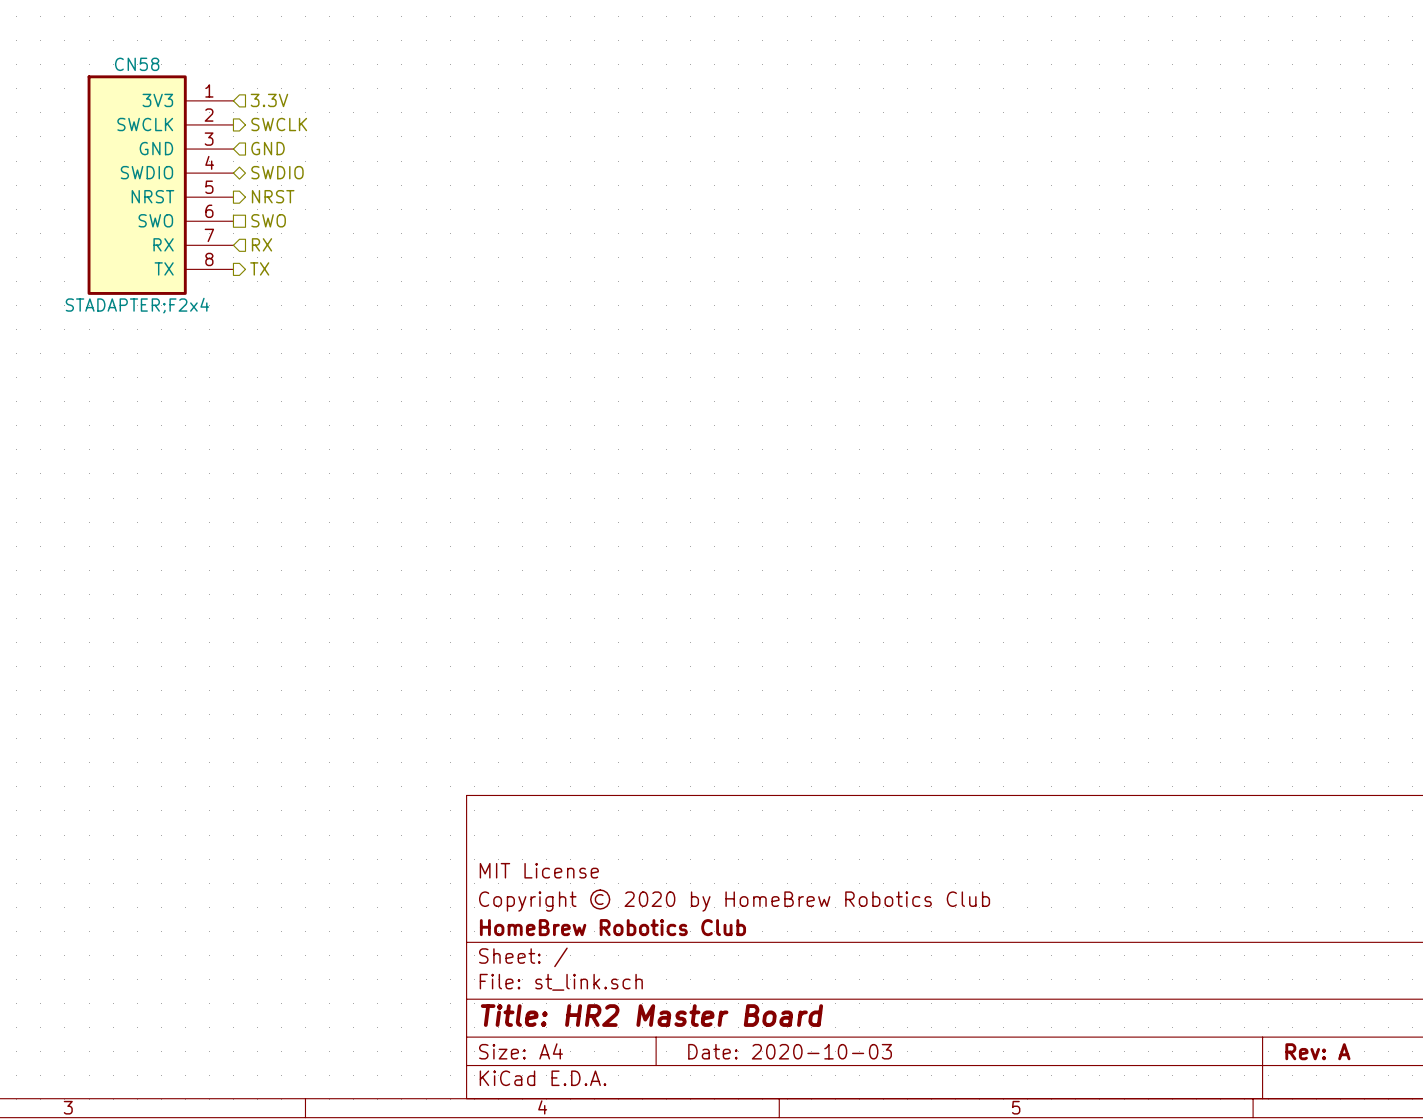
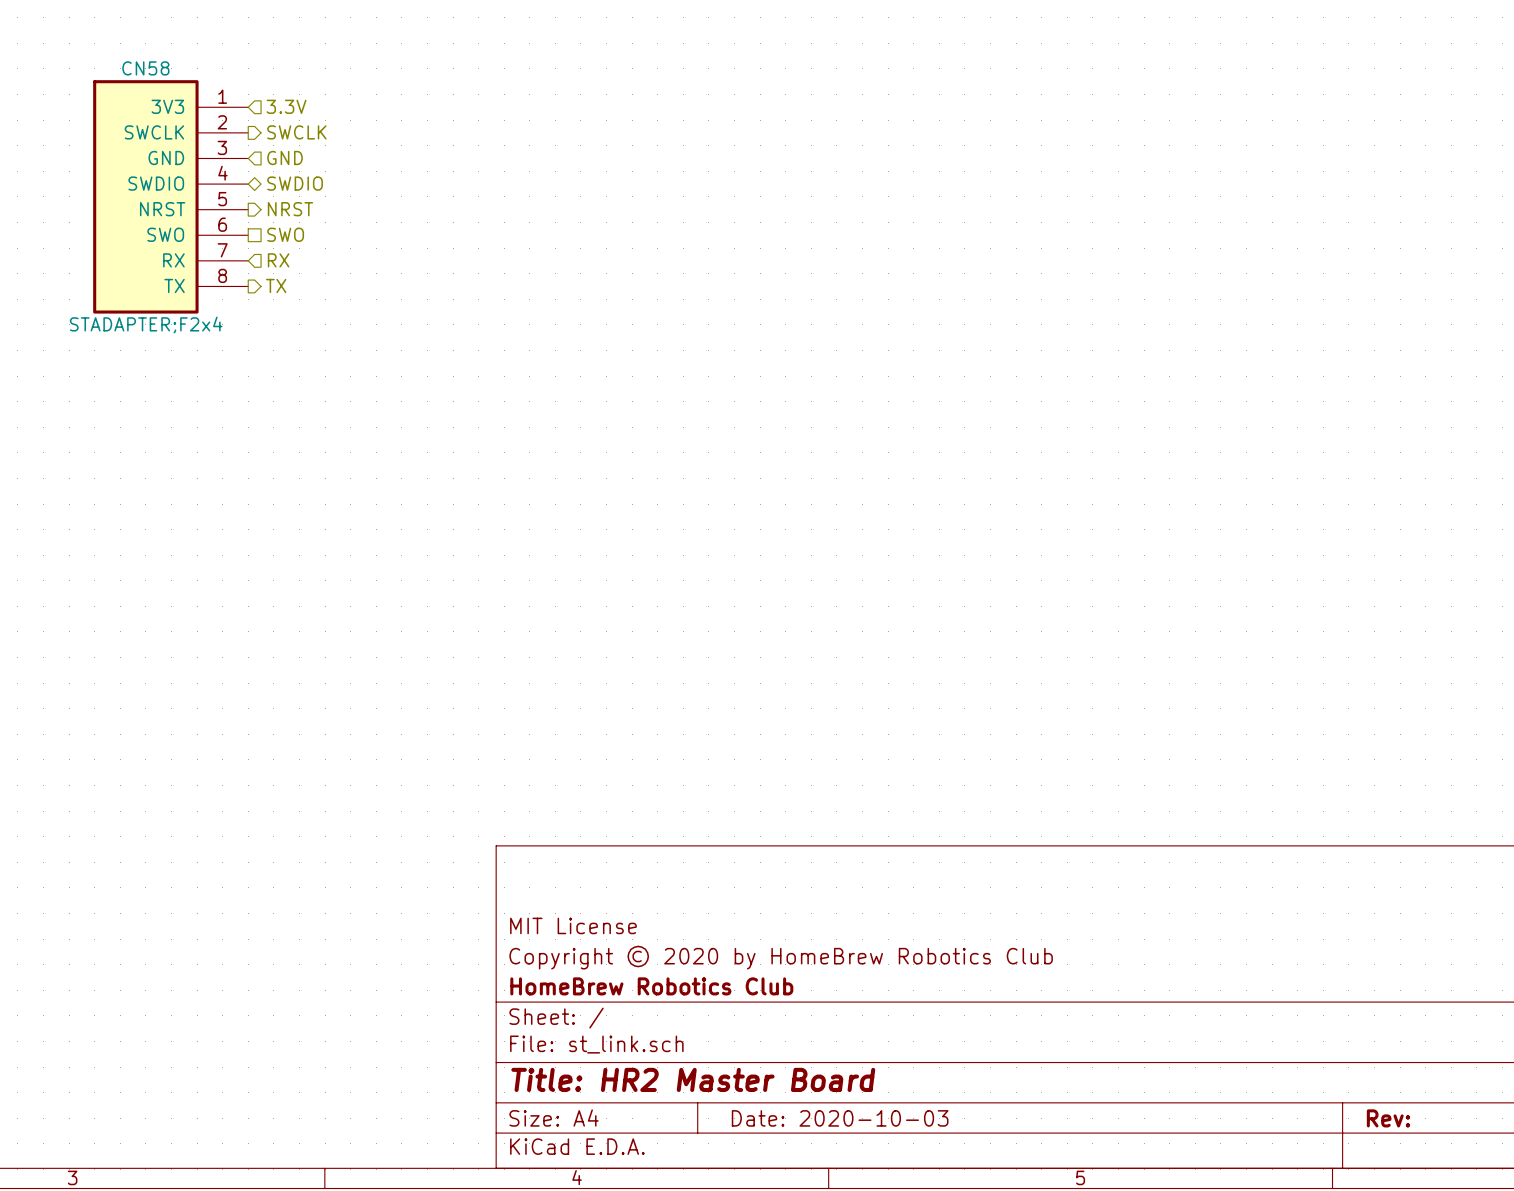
title block: Rev: A (1317, 1051) -> Rev: (1388, 1118)

